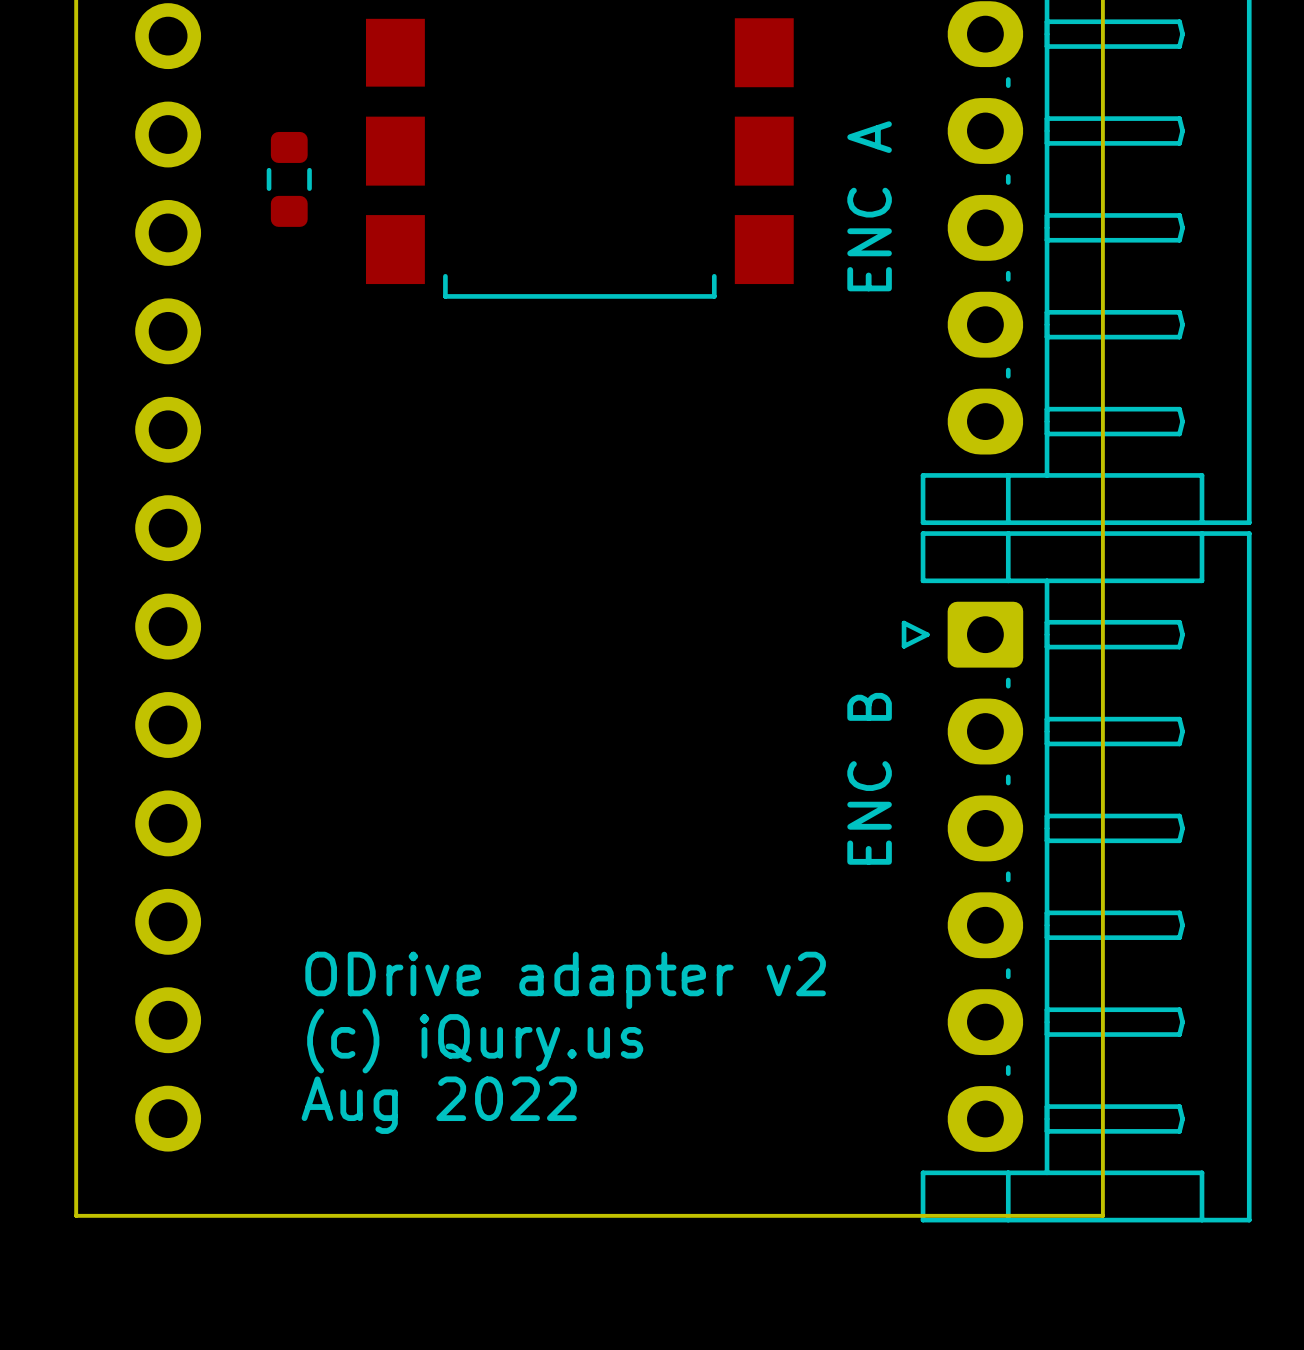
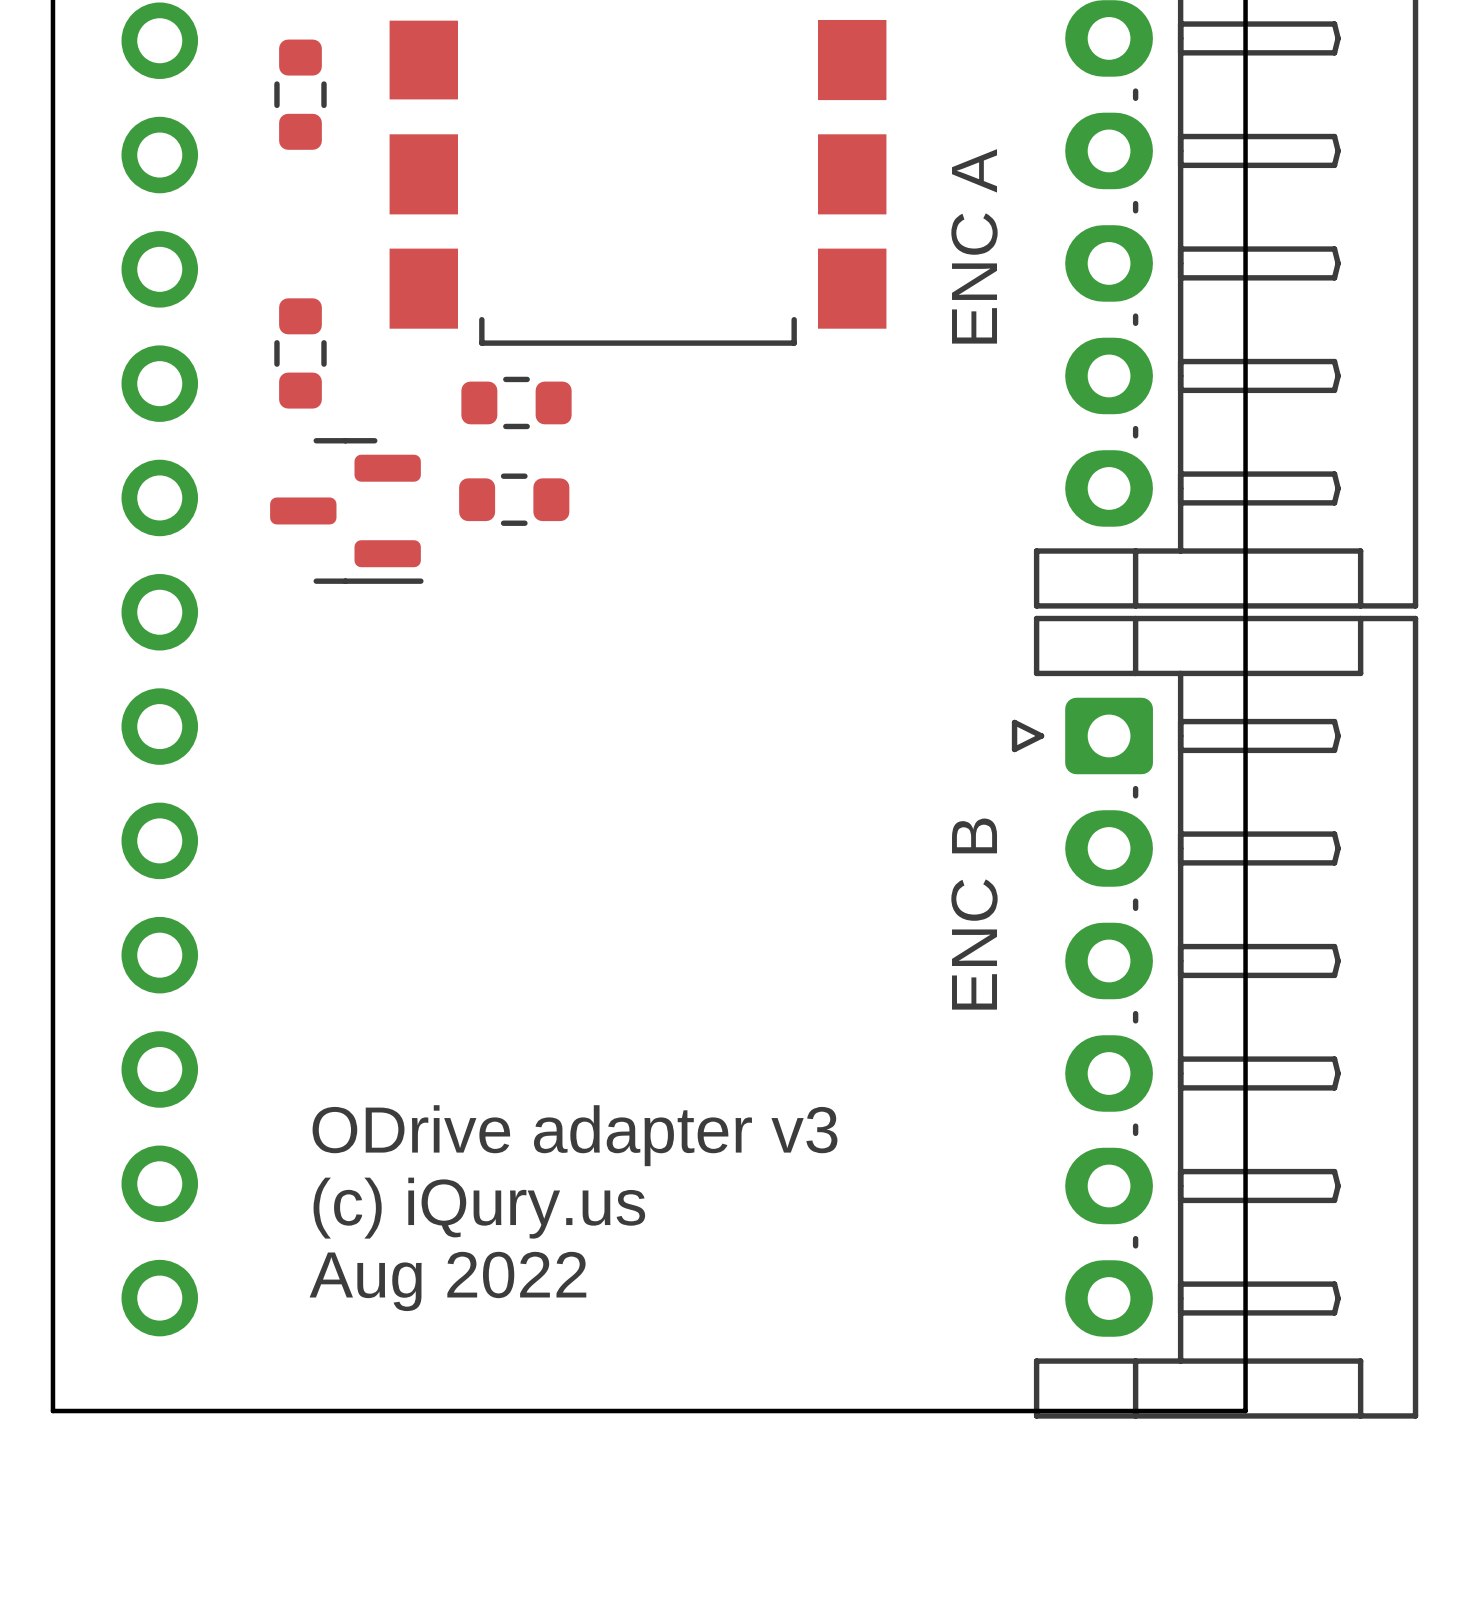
part: none -> (300, 94)
part: (289, 179) -> none
part: none -> (300, 353)
part: none -> (516, 402)
part: none -> (514, 499)
part: none -> (346, 510)
text: ODrive adapter v2 (565, 980) -> ODrive adapter v3 (575, 1135)

